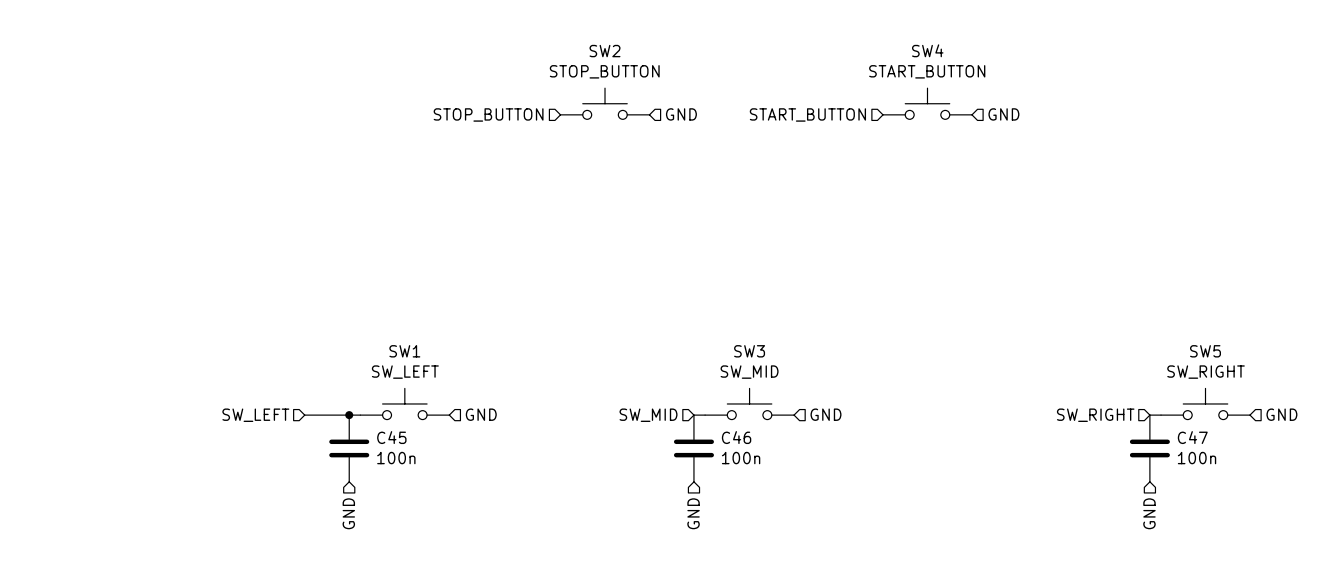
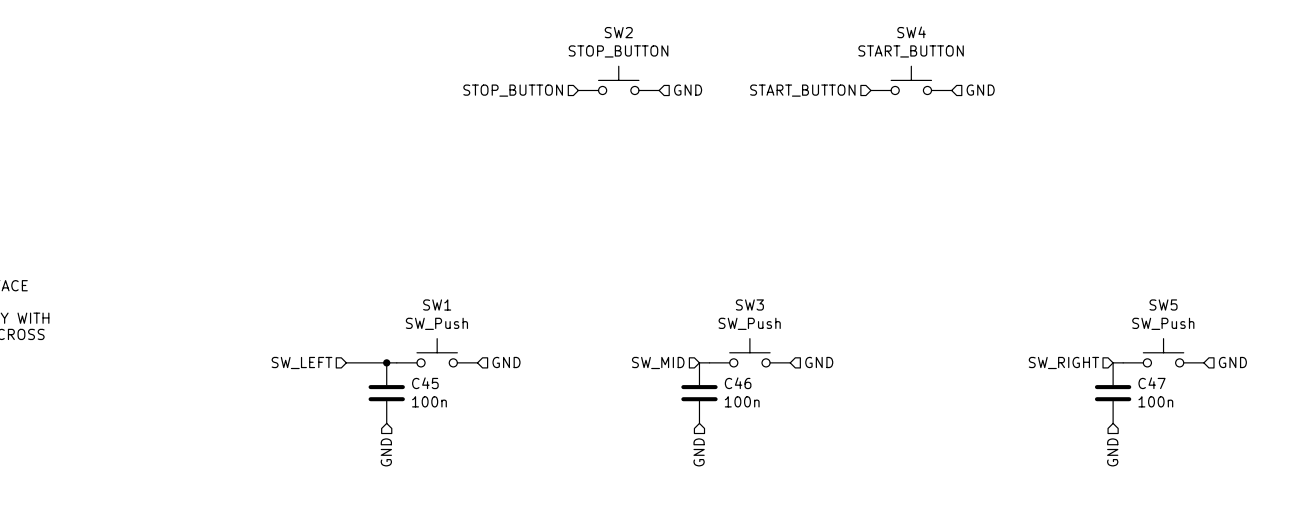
SW1 value: SW_LEFT (405, 372) -> SW_Push (436, 323)
SW3 value: SW_MID (749, 372) -> SW_Push (749, 323)
SW5 value: SW_RIGHT (1206, 372) -> SW_Push (1163, 323)

